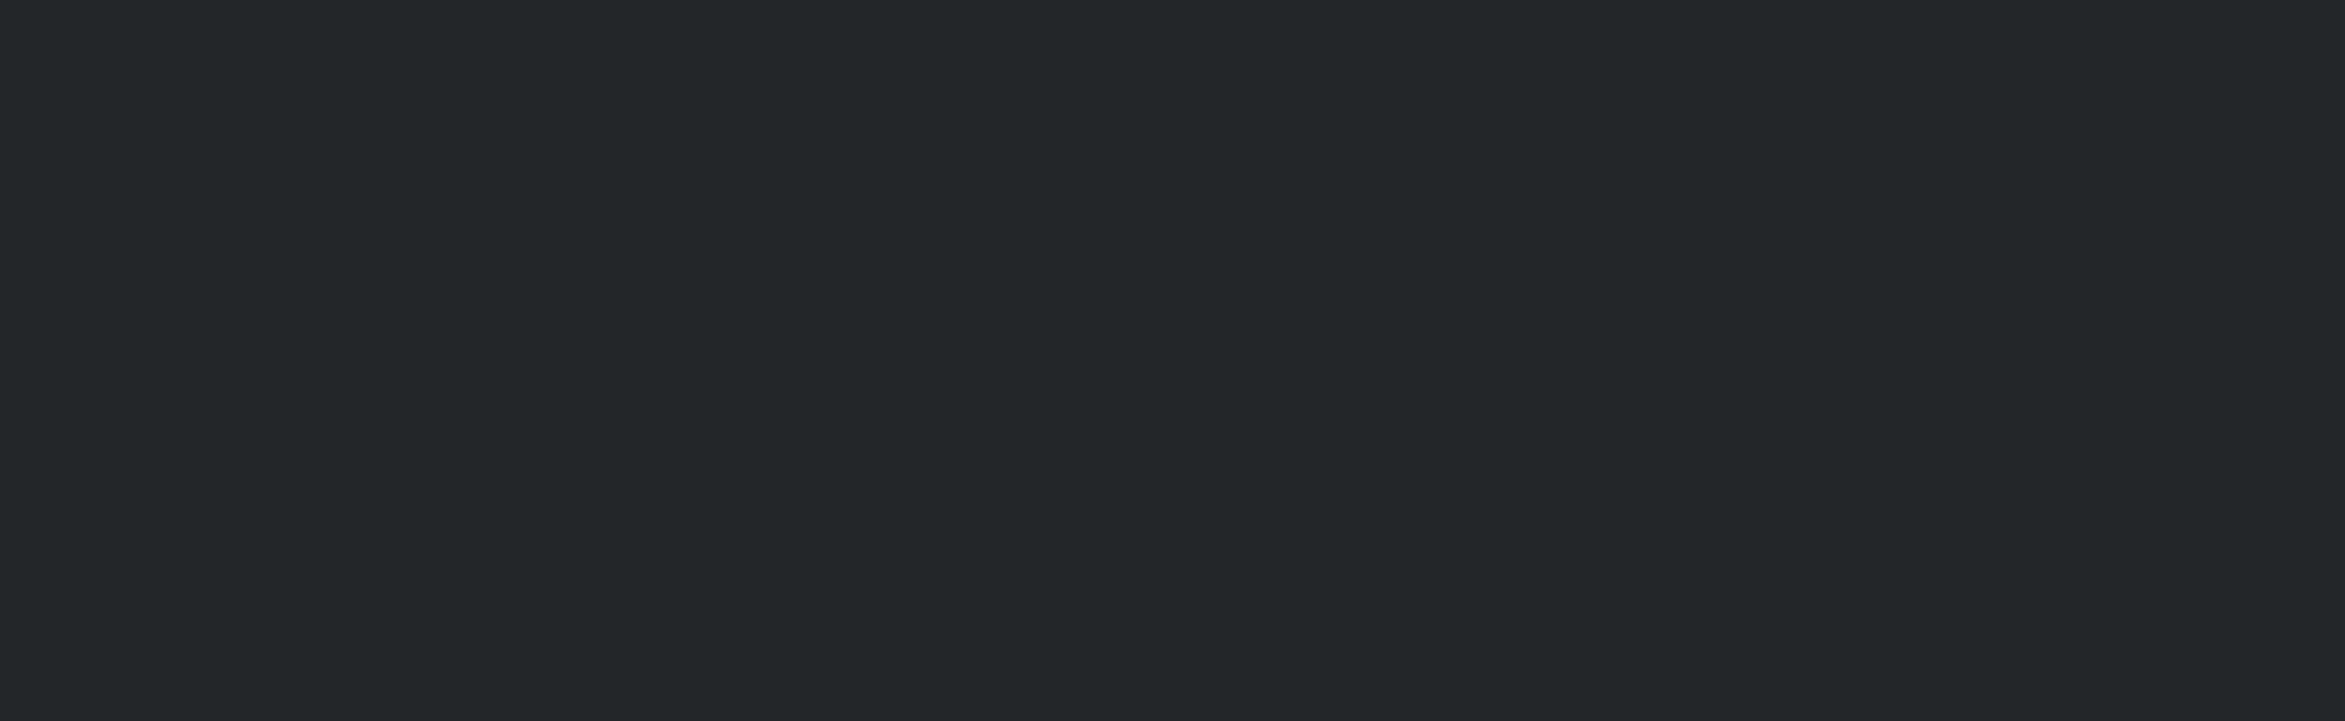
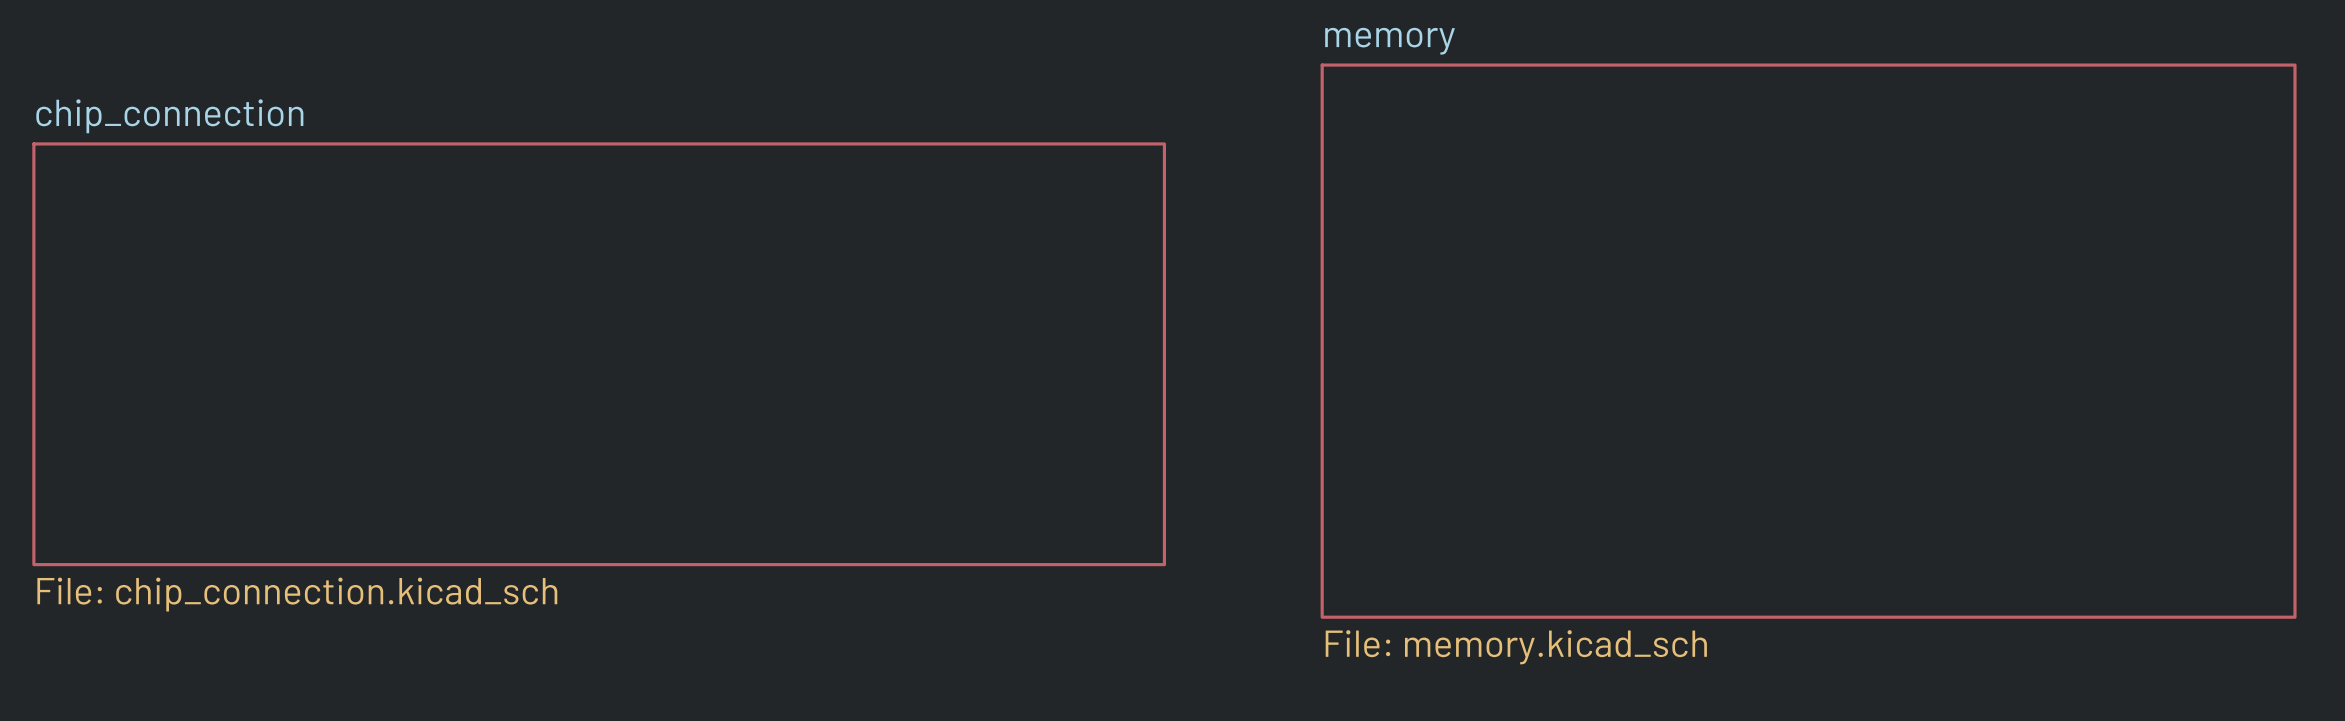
sheet memory: none -> File: memory.kicad_sch (1808, 341)
sheet chip_connection: none -> File: chip_connection.kicad_sch (599, 354)

